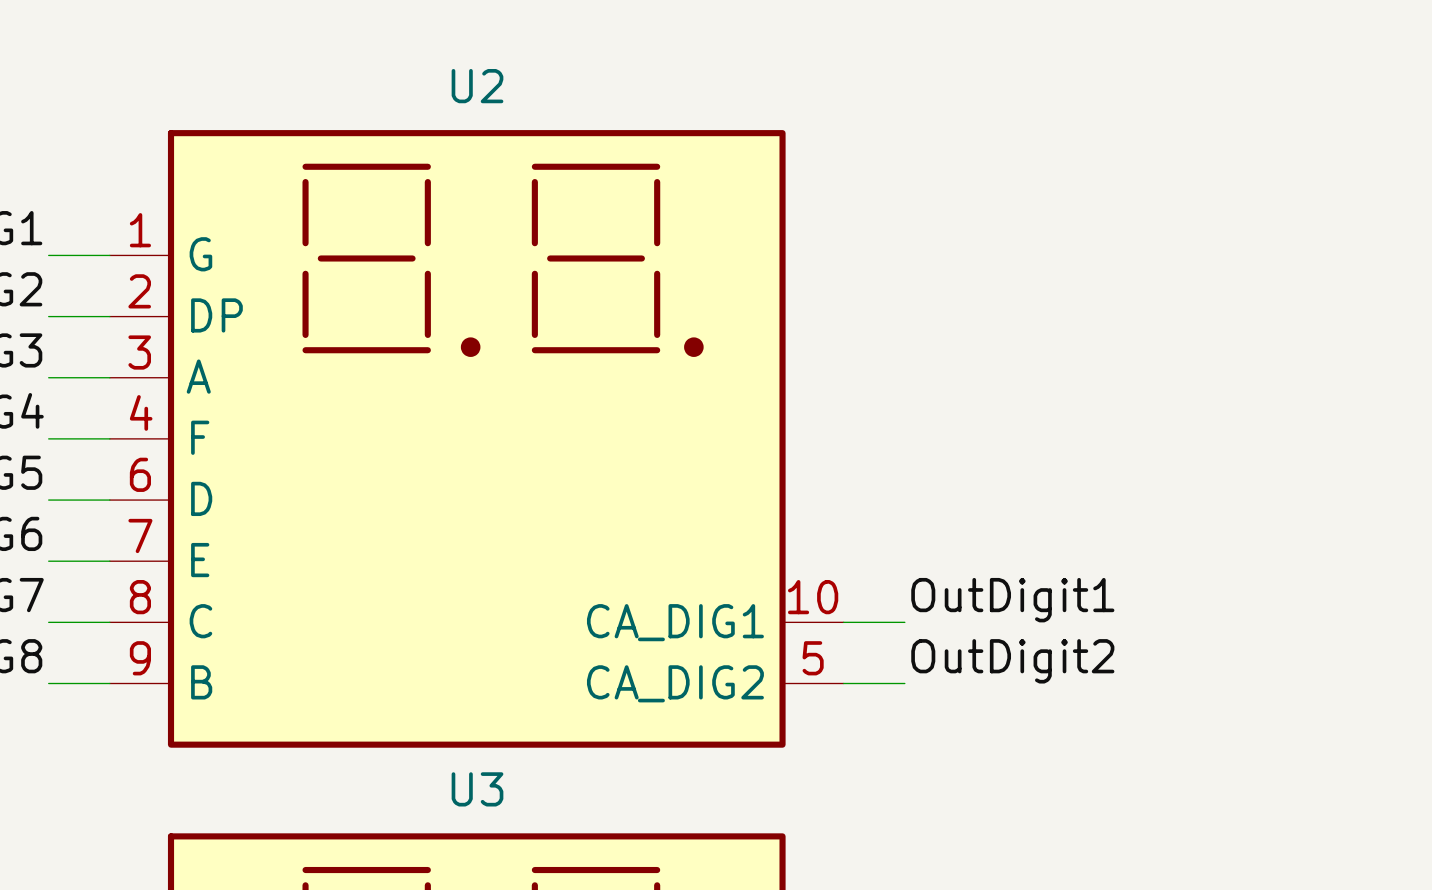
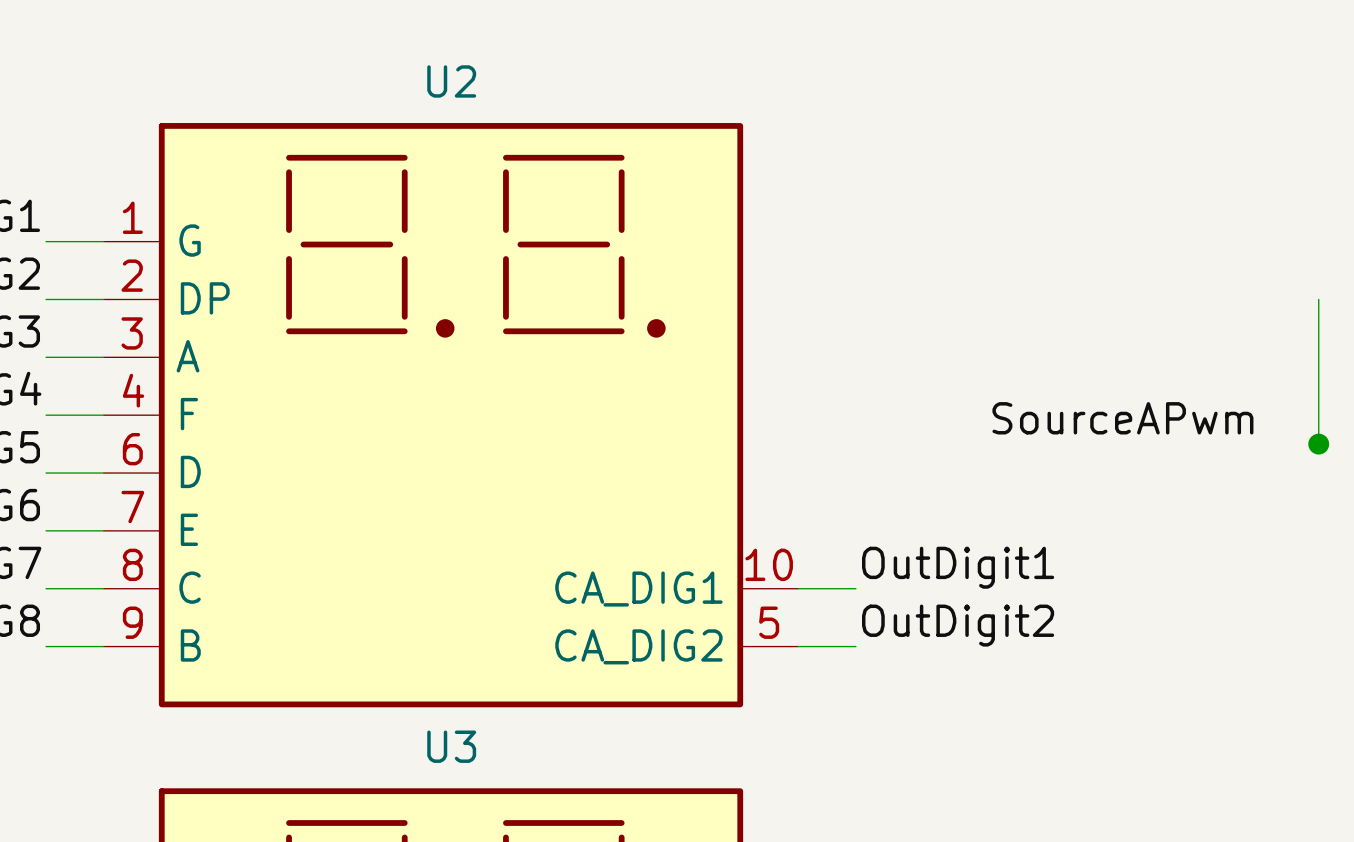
wire: none -> (1318, 299) (1318, 444)
label: none -> SourceAPwm (1122, 418)
junction: none -> (1318, 444)

